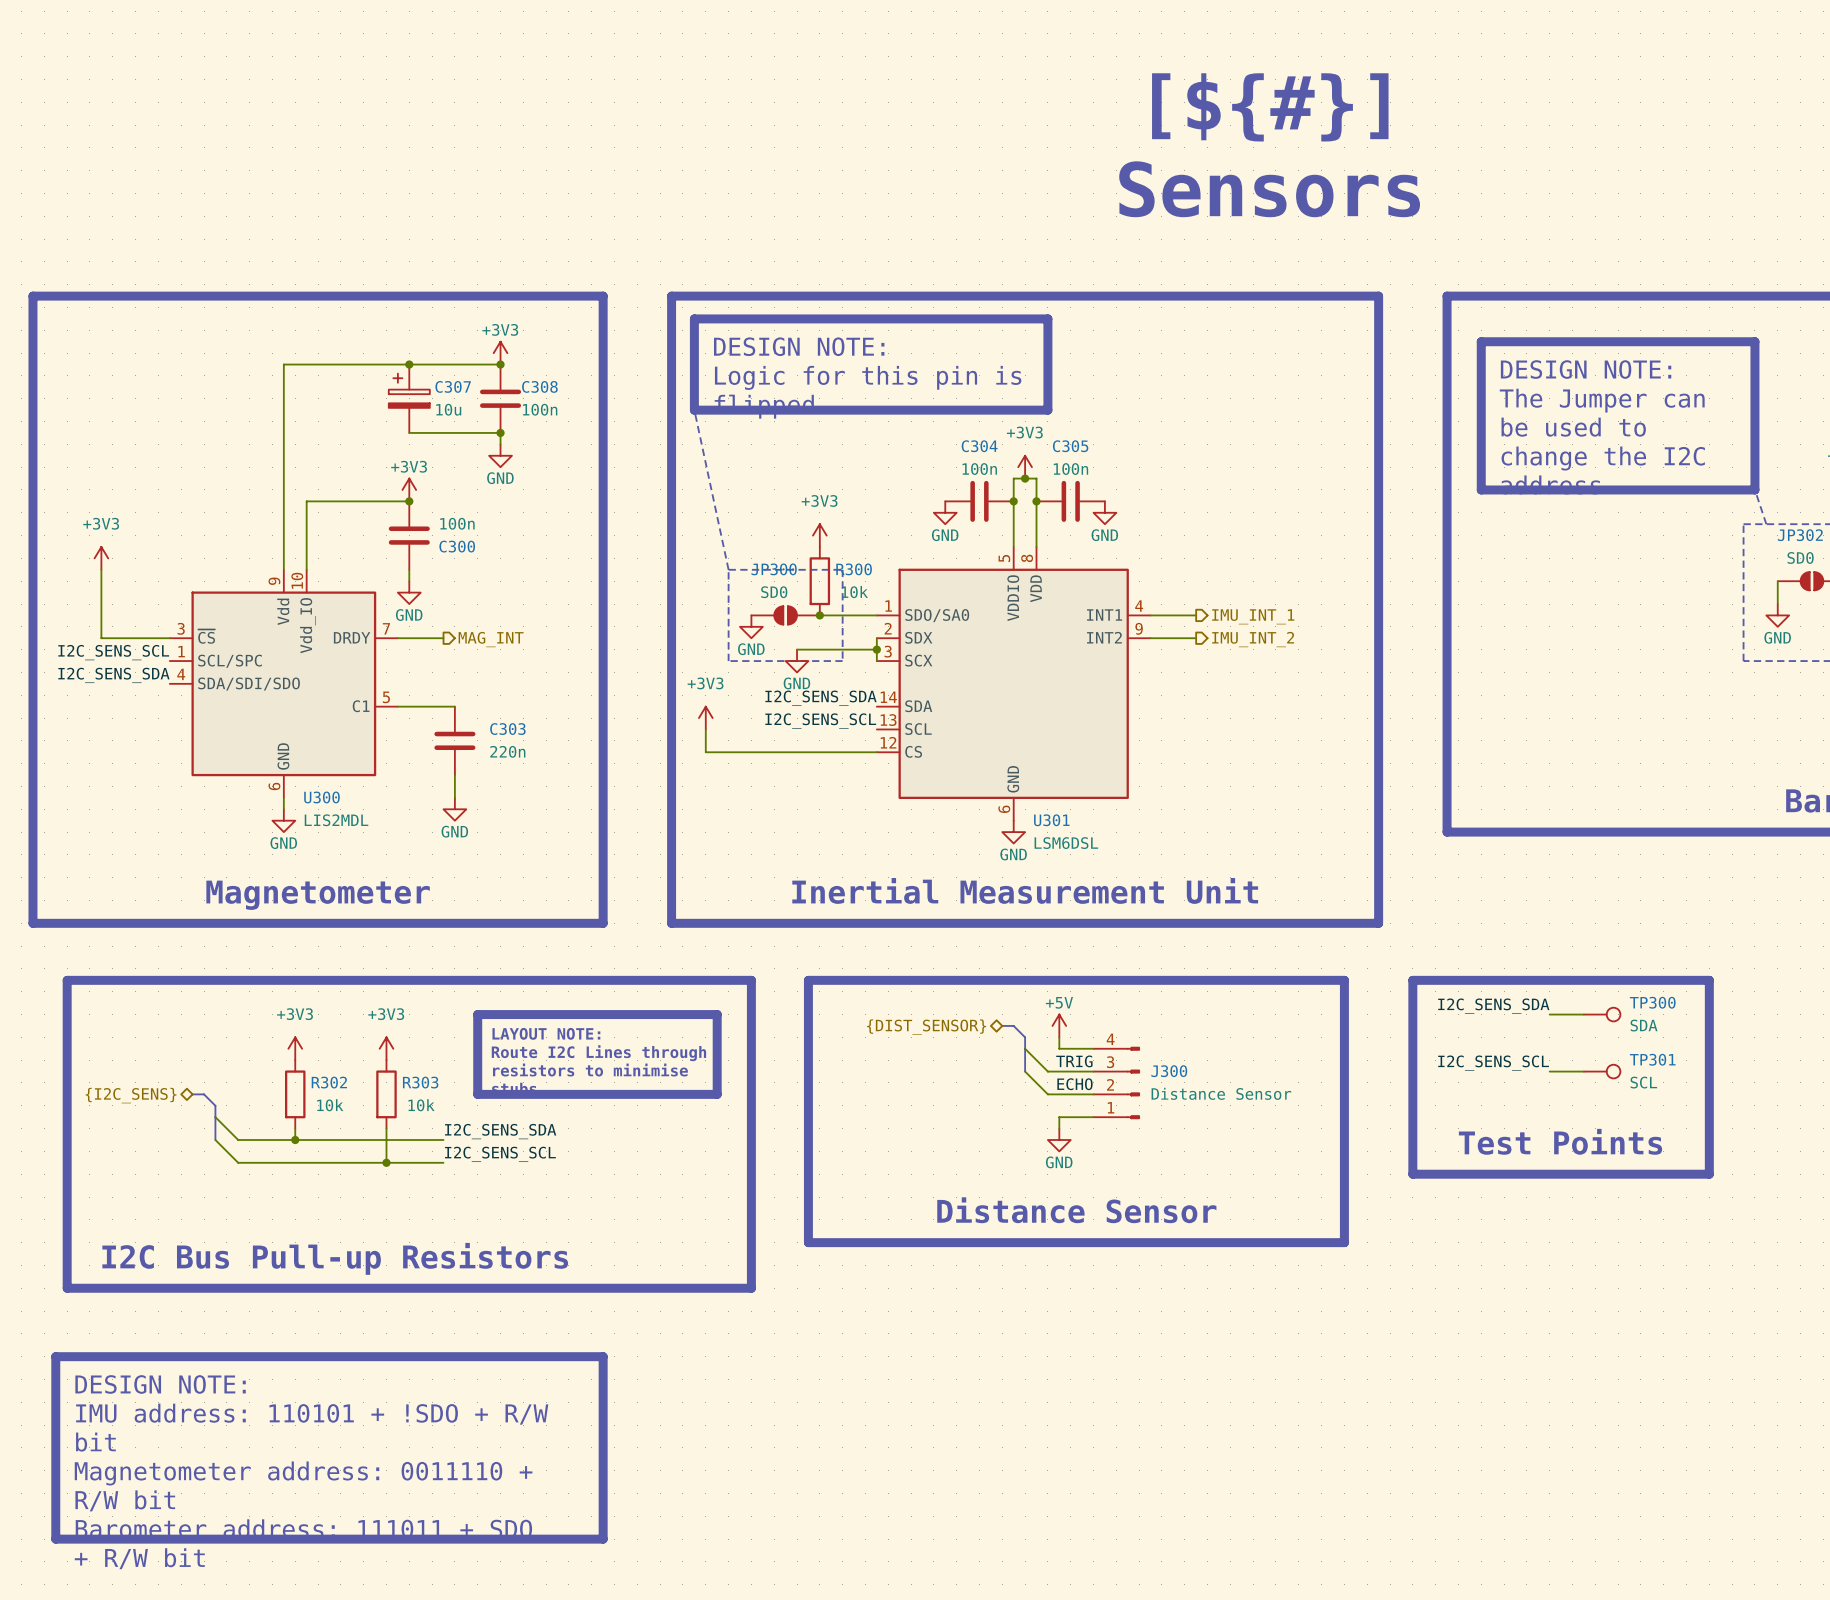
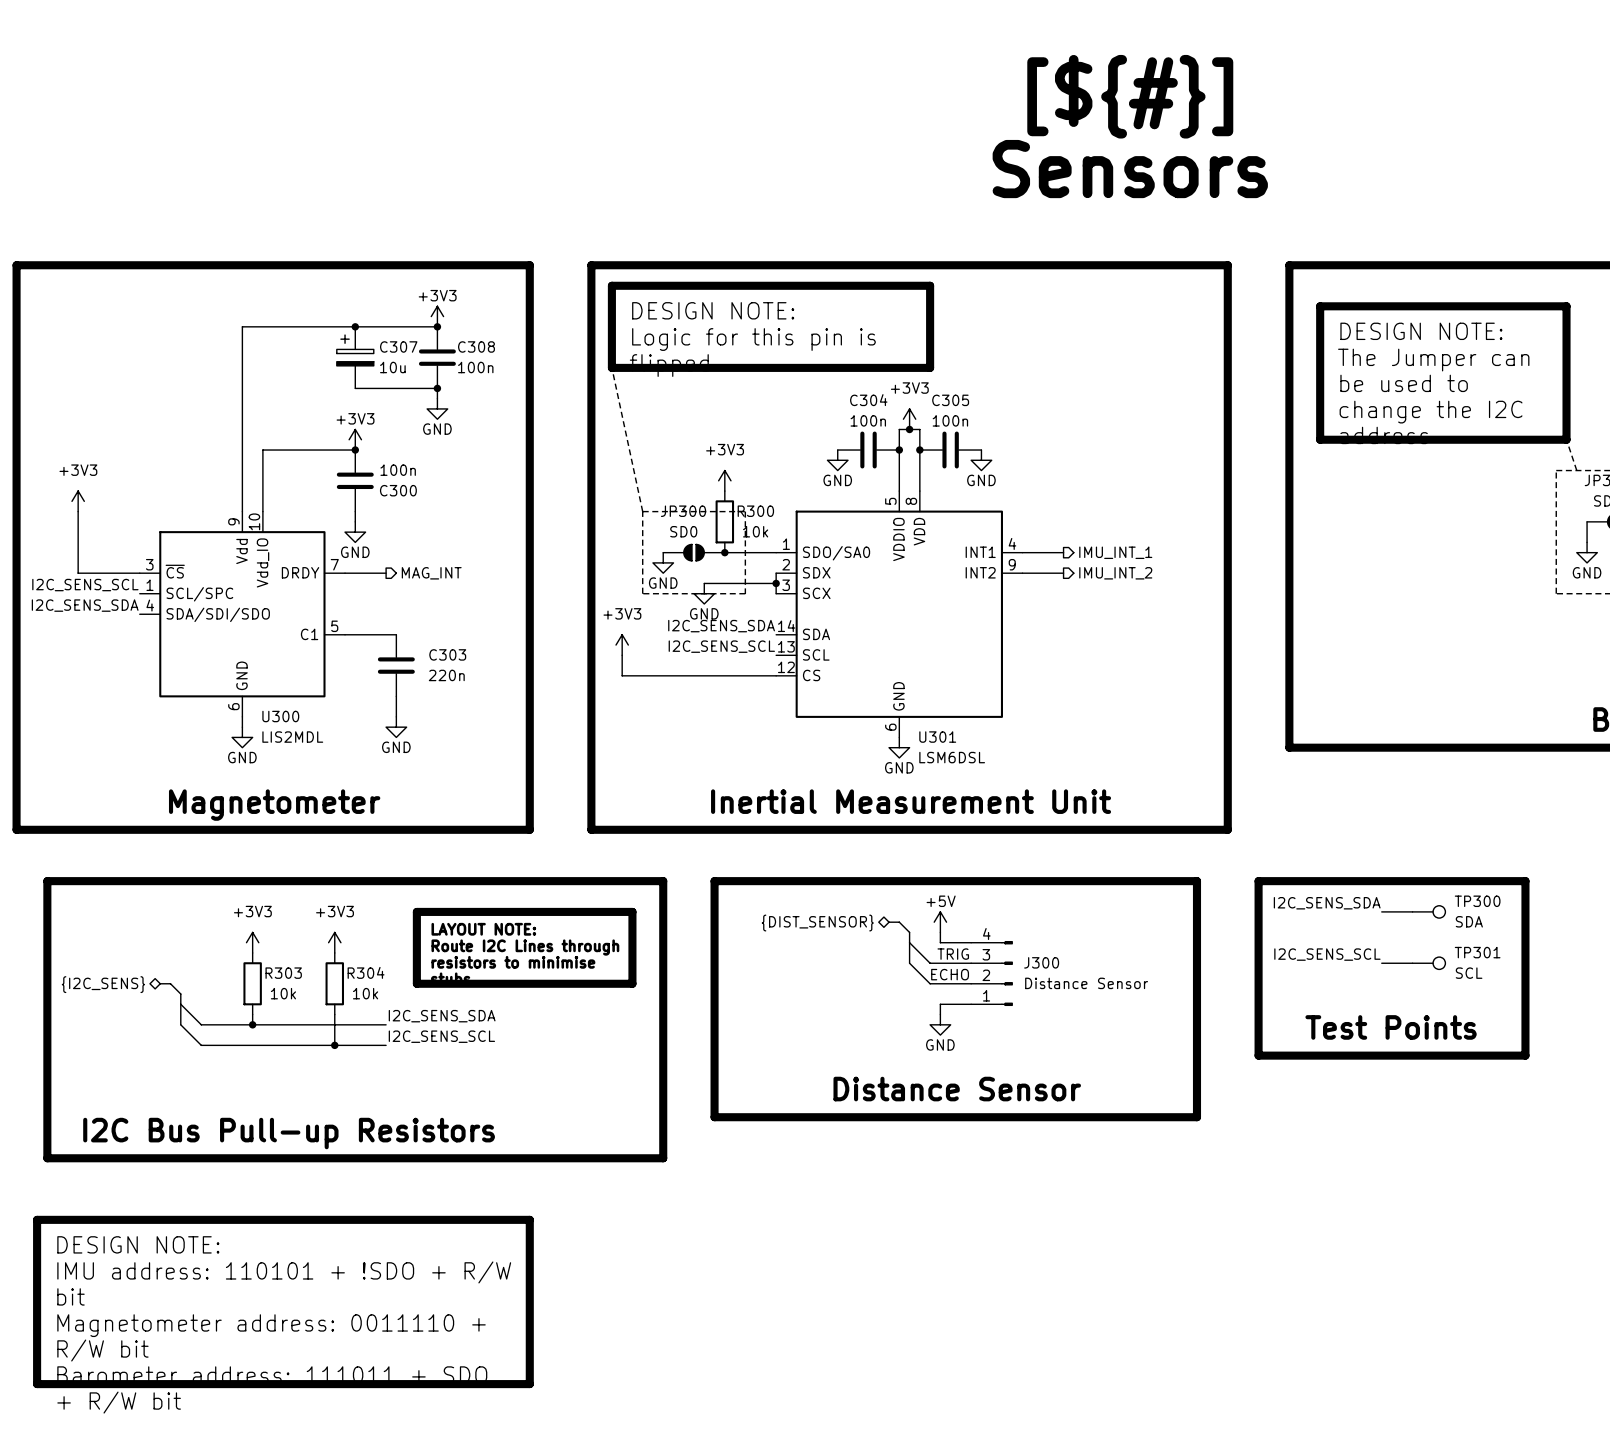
R302 name: R302 (329, 1082) -> R303 (283, 973)
R303 name: R303 (420, 1082) -> R304 (366, 972)

